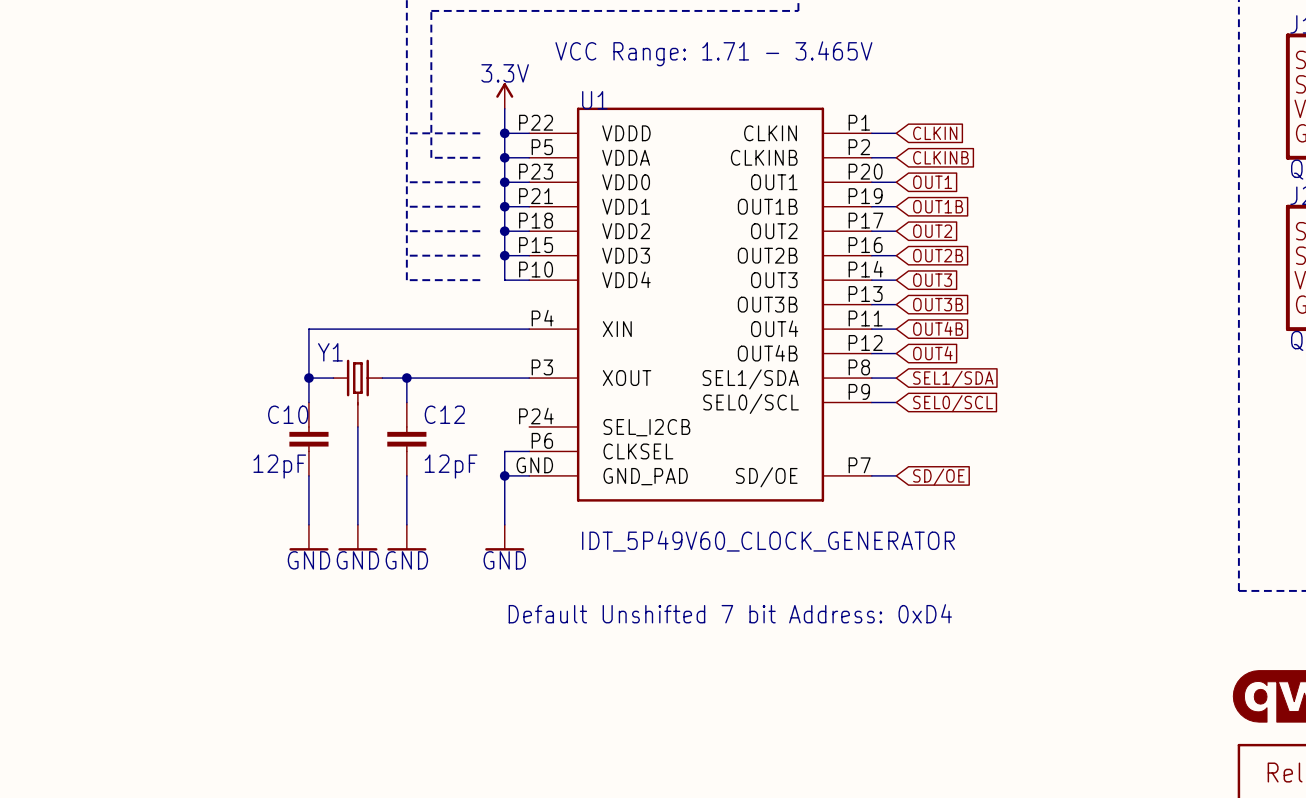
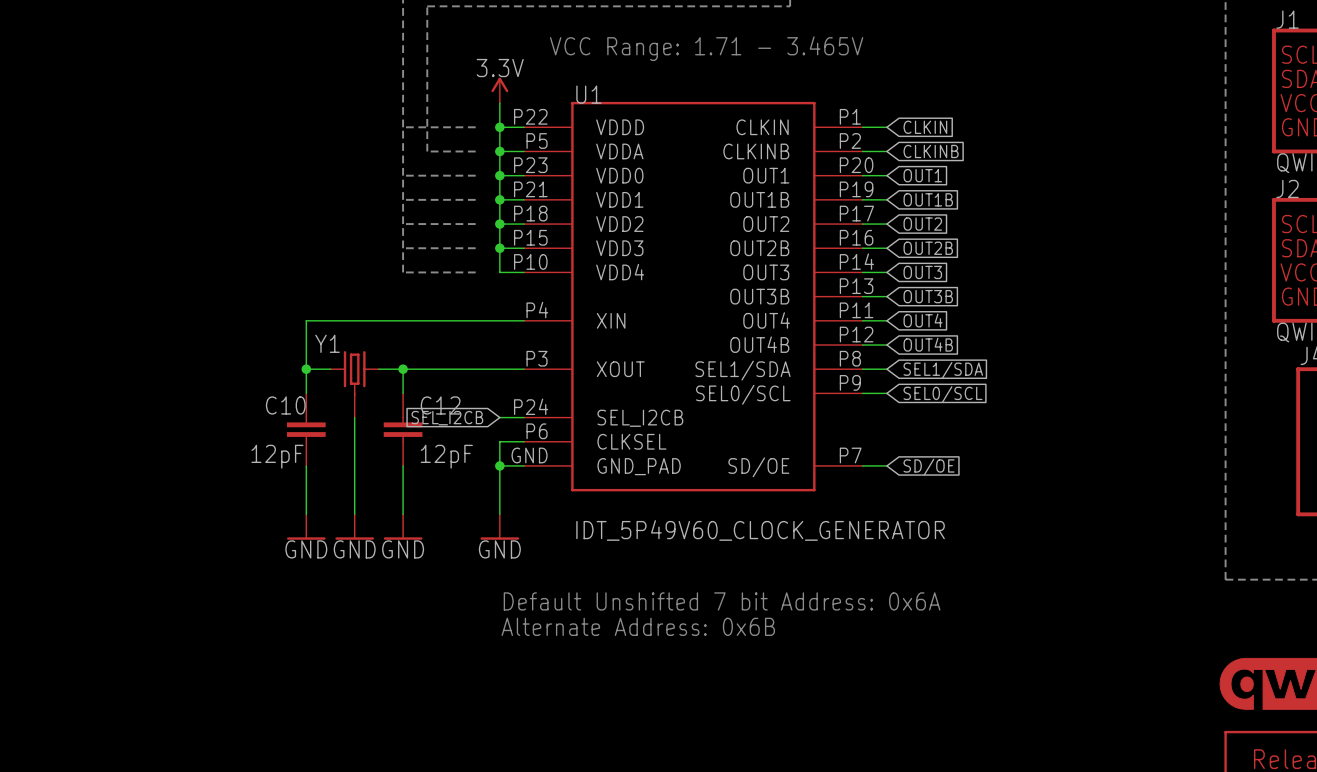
global label: OUT4B (938, 328) -> OUT4 (923, 320)
global label: OUT4 (932, 353) -> OUT4B (928, 344)
wire: none -> (499, 417) (524, 417)
global label: none -> SEL_I2CB (447, 418)
text: Default Unshifted 7 bit Address: 0xD4 (730, 613) -> Default Unshifted 7 bit Address: 0x6A (722, 601)
text: none -> Alternate Address: 0x6B (638, 626)

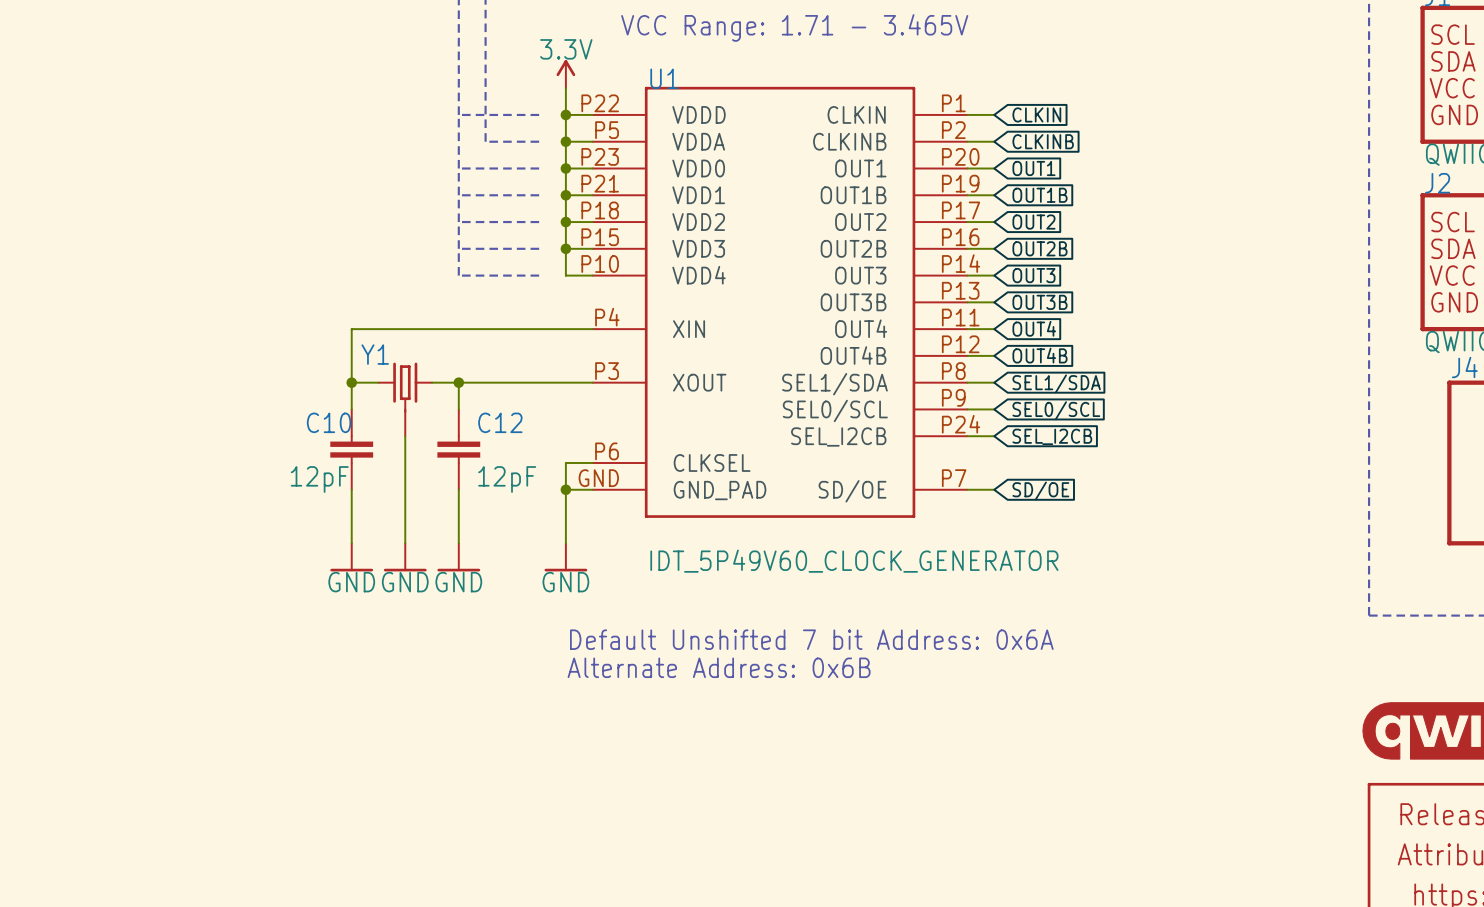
U1 symbol: [524, 101, 863, 492] -> [592, 86, 968, 518]
wire: (499, 417) (524, 417) -> none
wire: none -> (967, 436) (994, 436)
global label: SEL_I2CB (447, 418) -> none
global label: none -> SEL_I2CB (1052, 436)

